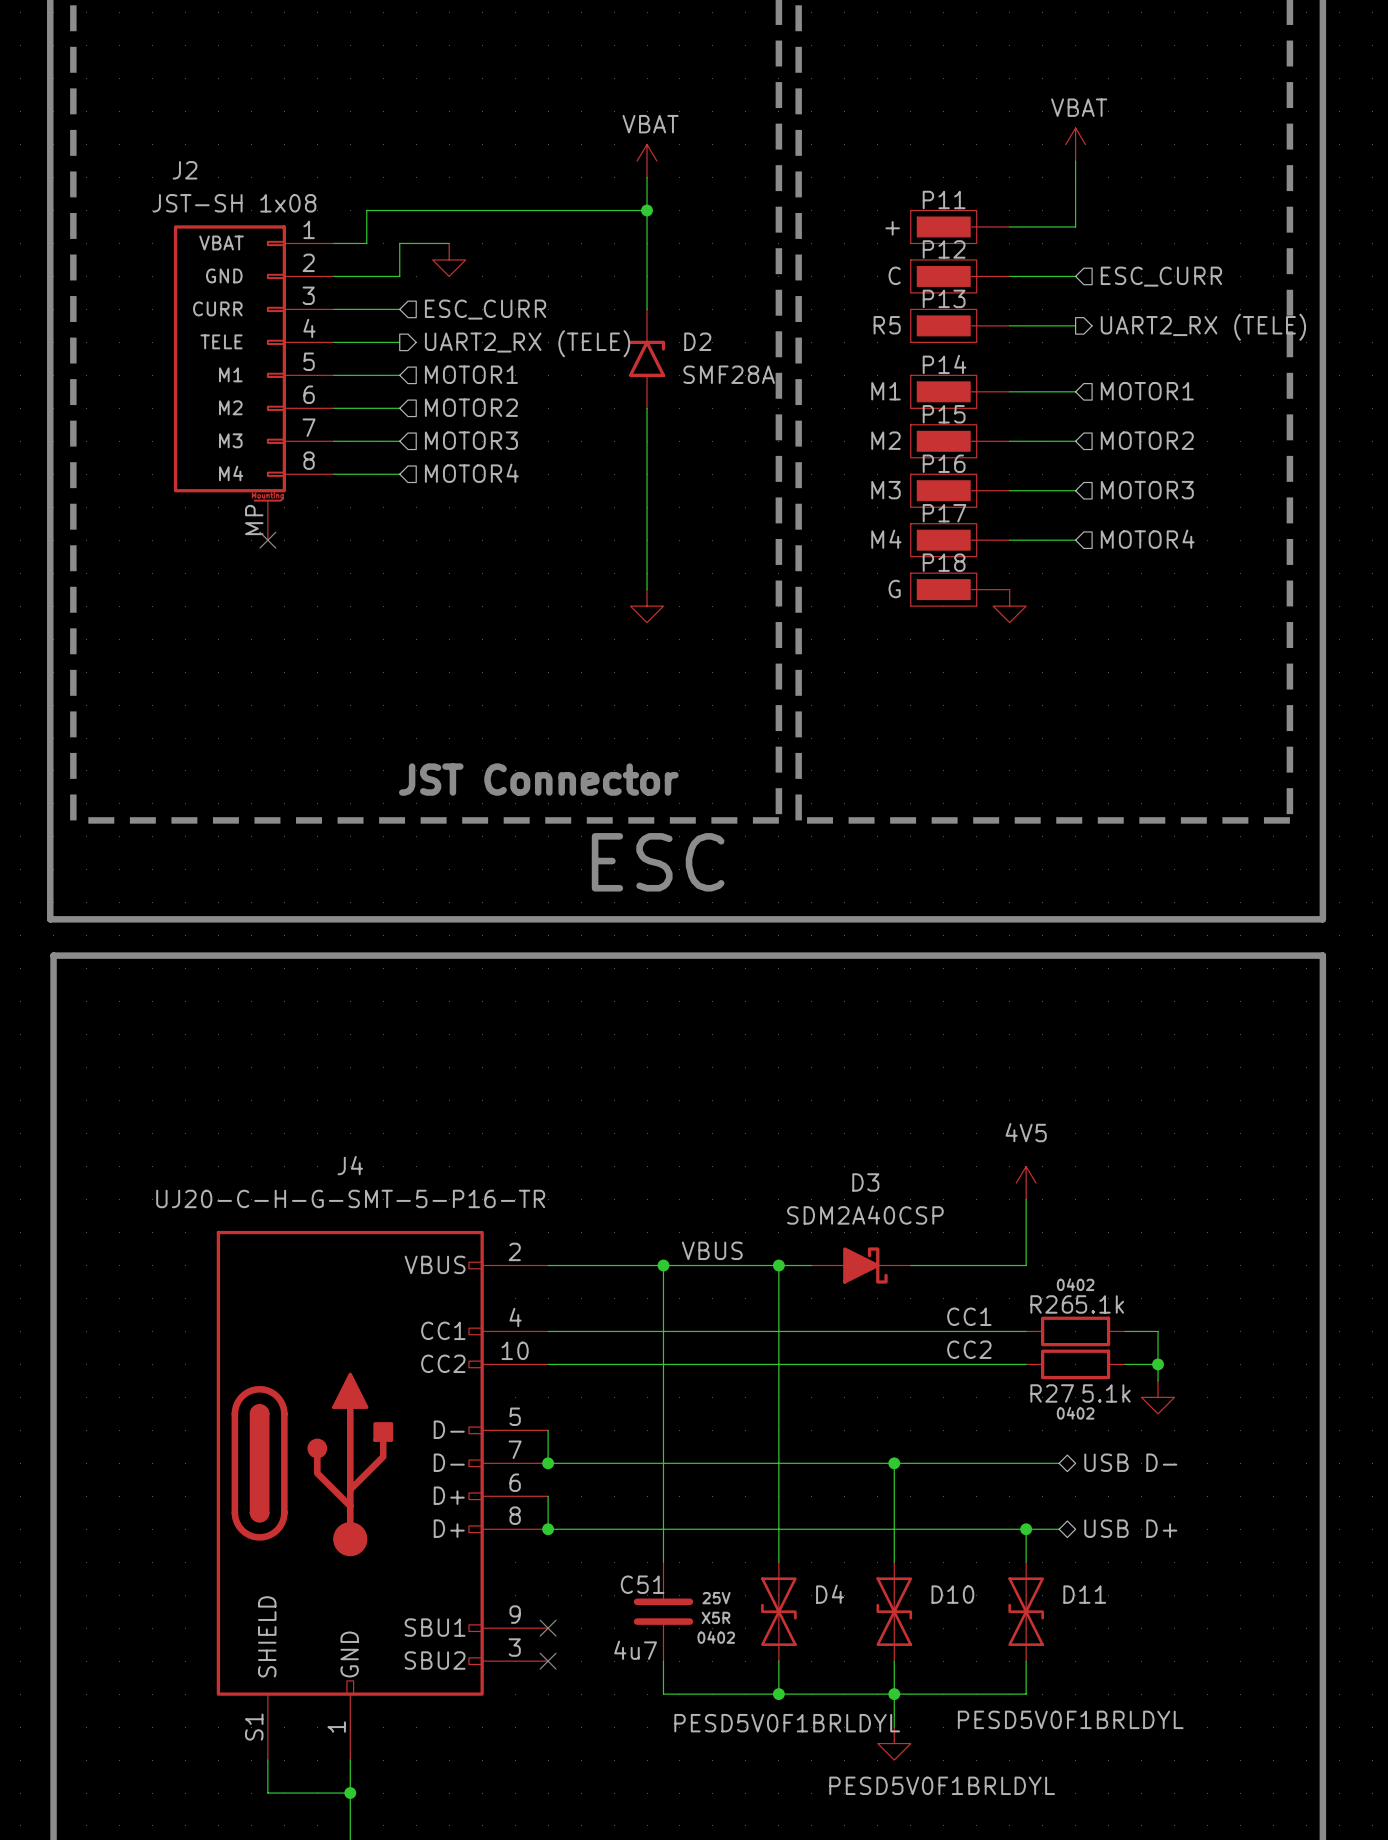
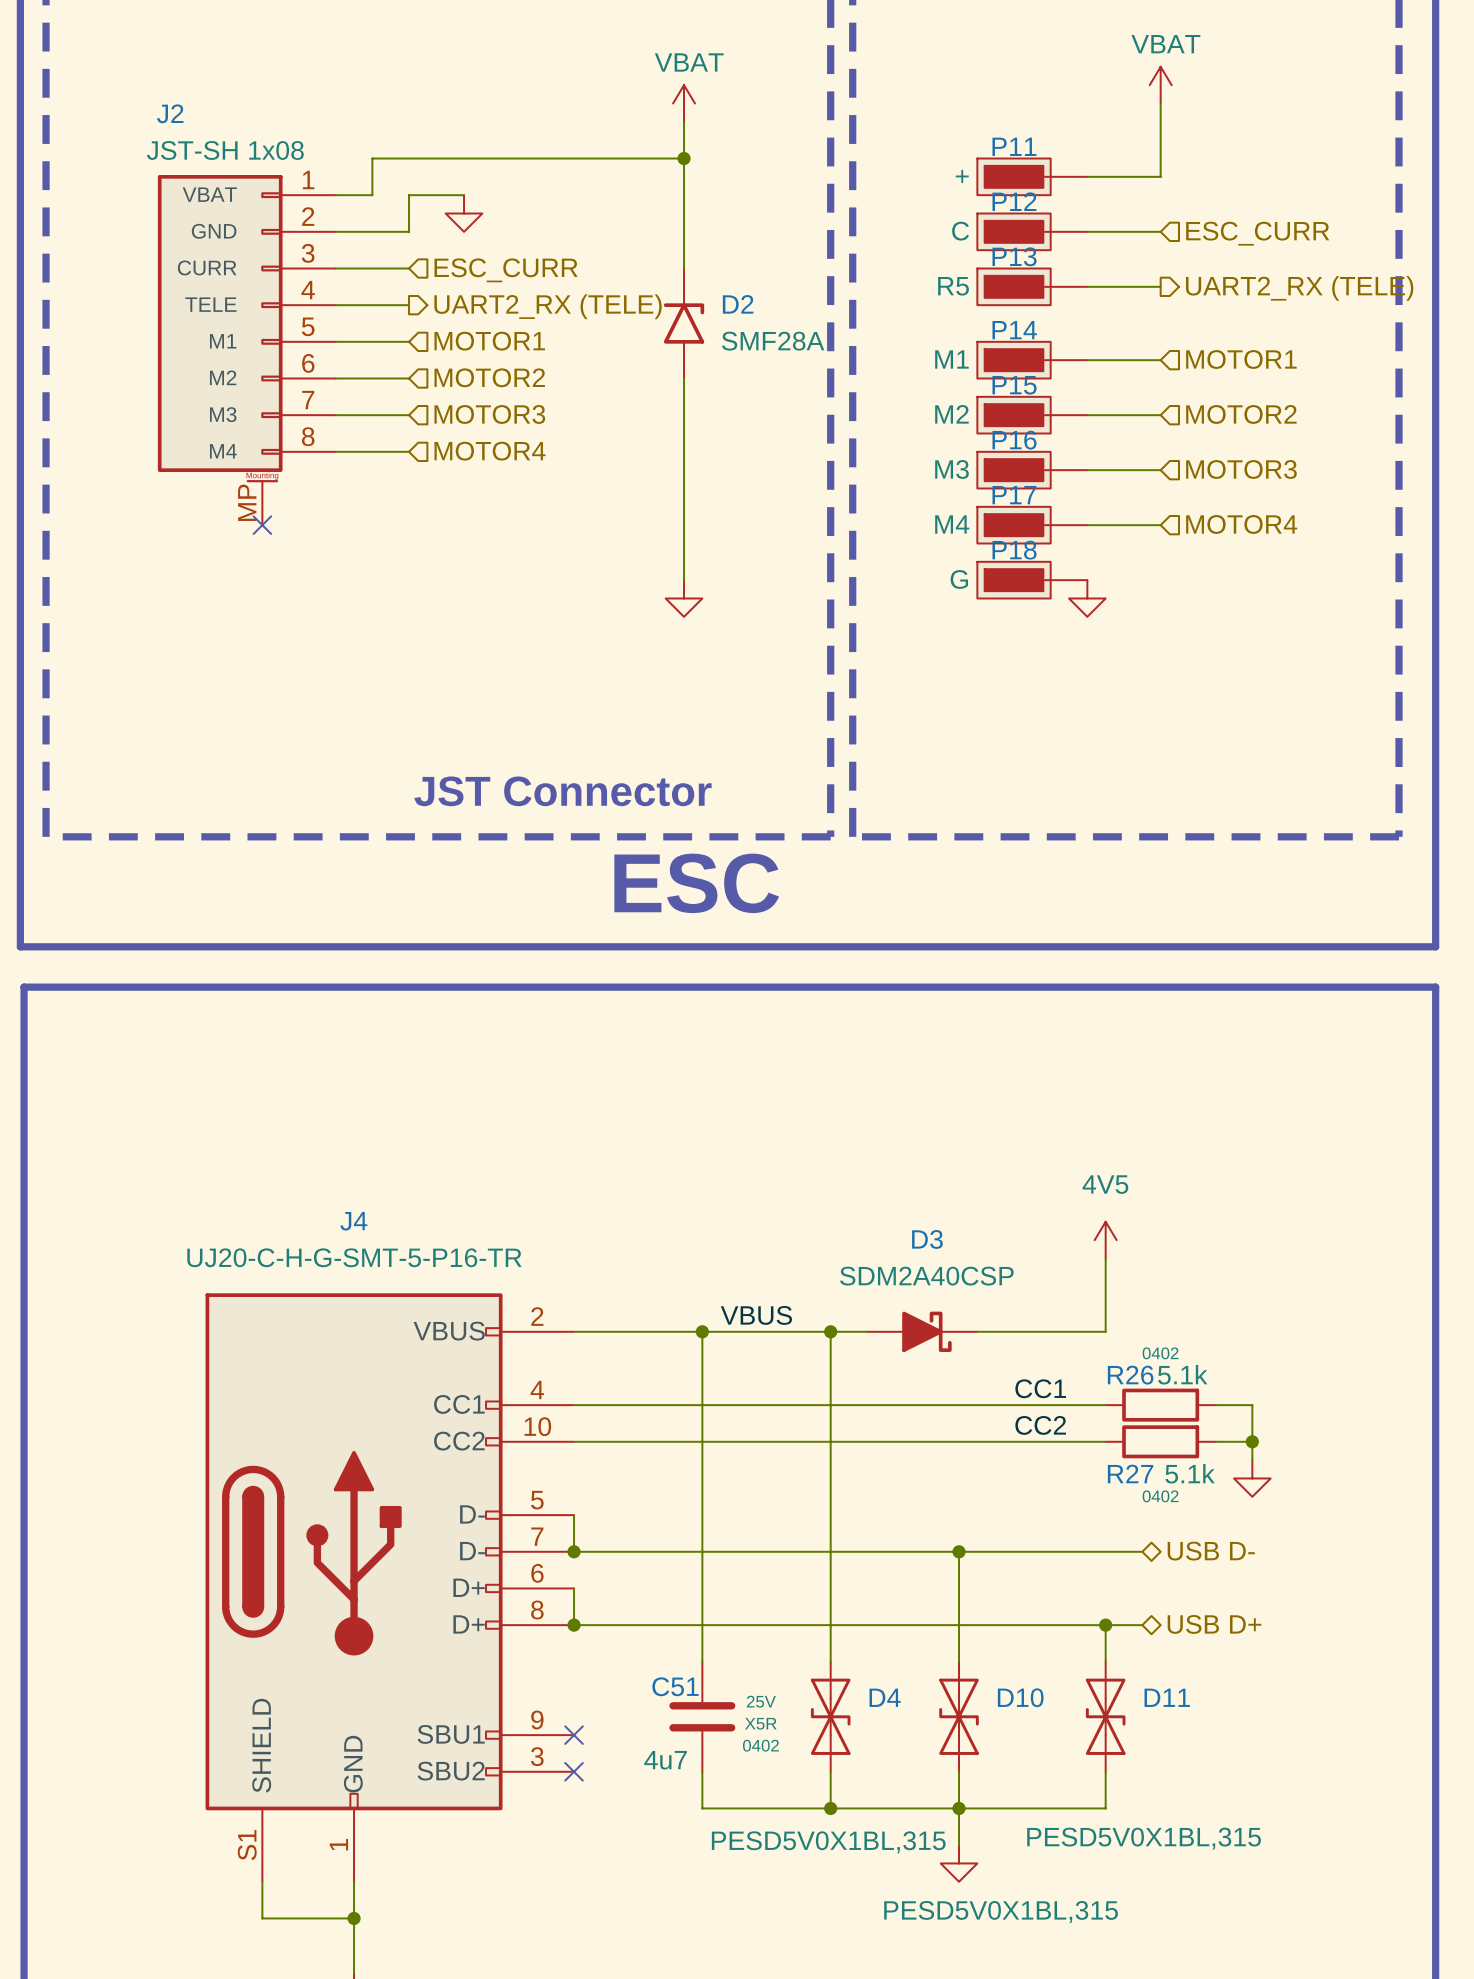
D11 value: PESD5V0F1BRLDYL (1070, 1719) -> PESD5V0X1BL,315 (1144, 1838)
D4 value: PESD5V0F1BRLDYL (787, 1723) -> PESD5V0X1BL,315 (828, 1842)
D10 value: PESD5V0F1BRLDYL (942, 1785) -> PESD5V0X1BL,315 (1001, 1912)

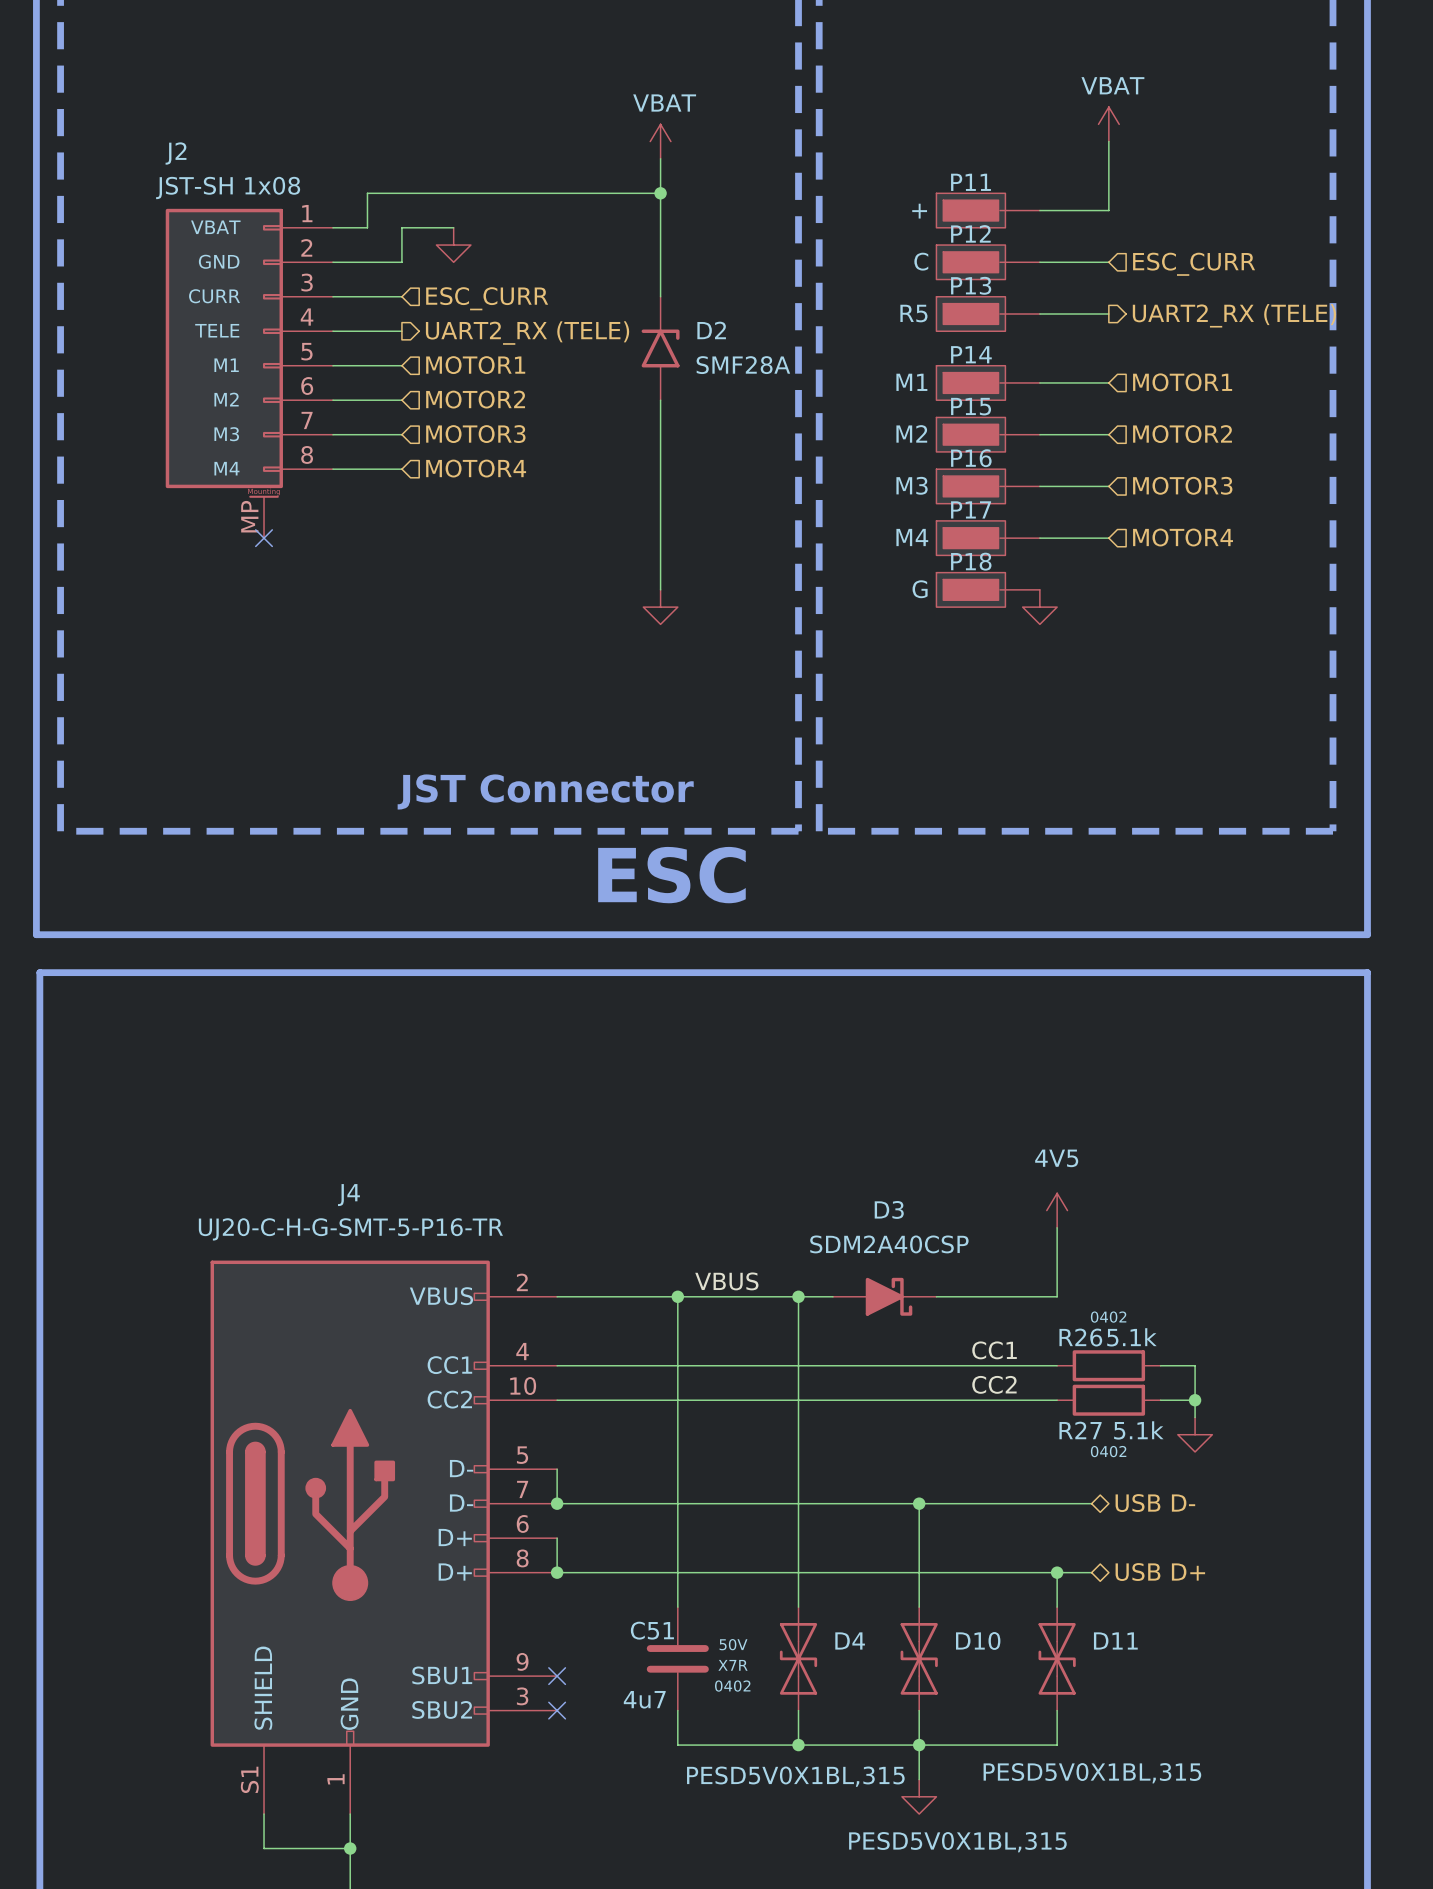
C51 text: 25V (761, 1701) -> 50V (733, 1644)
C51 text: X5R (760, 1723) -> X7R (733, 1665)

